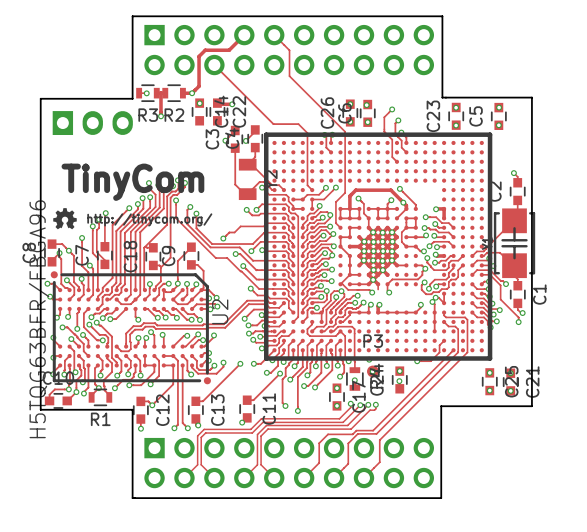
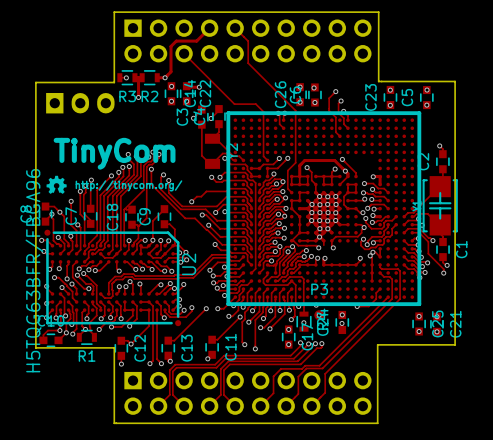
via: none -> (171, 101)
via: none -> (186, 101)

